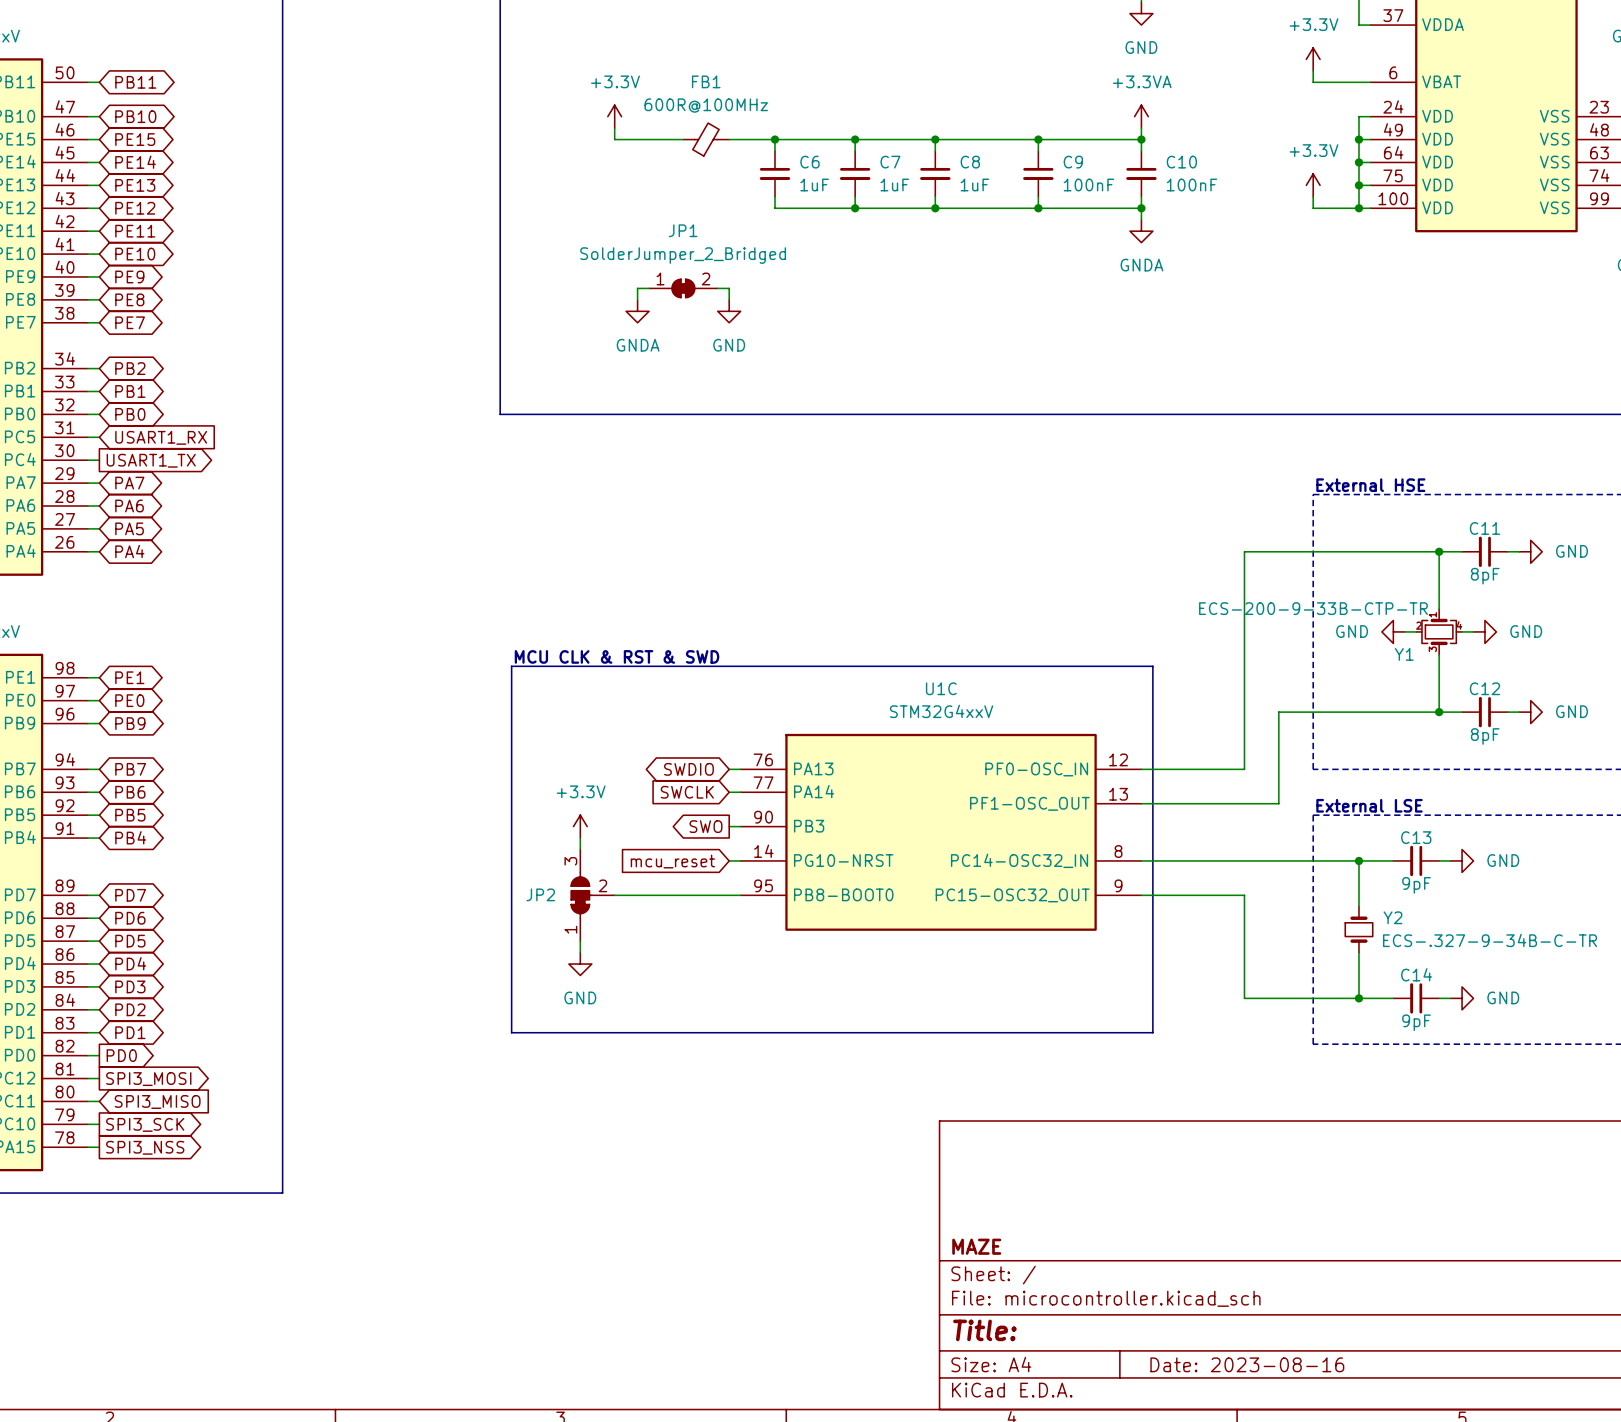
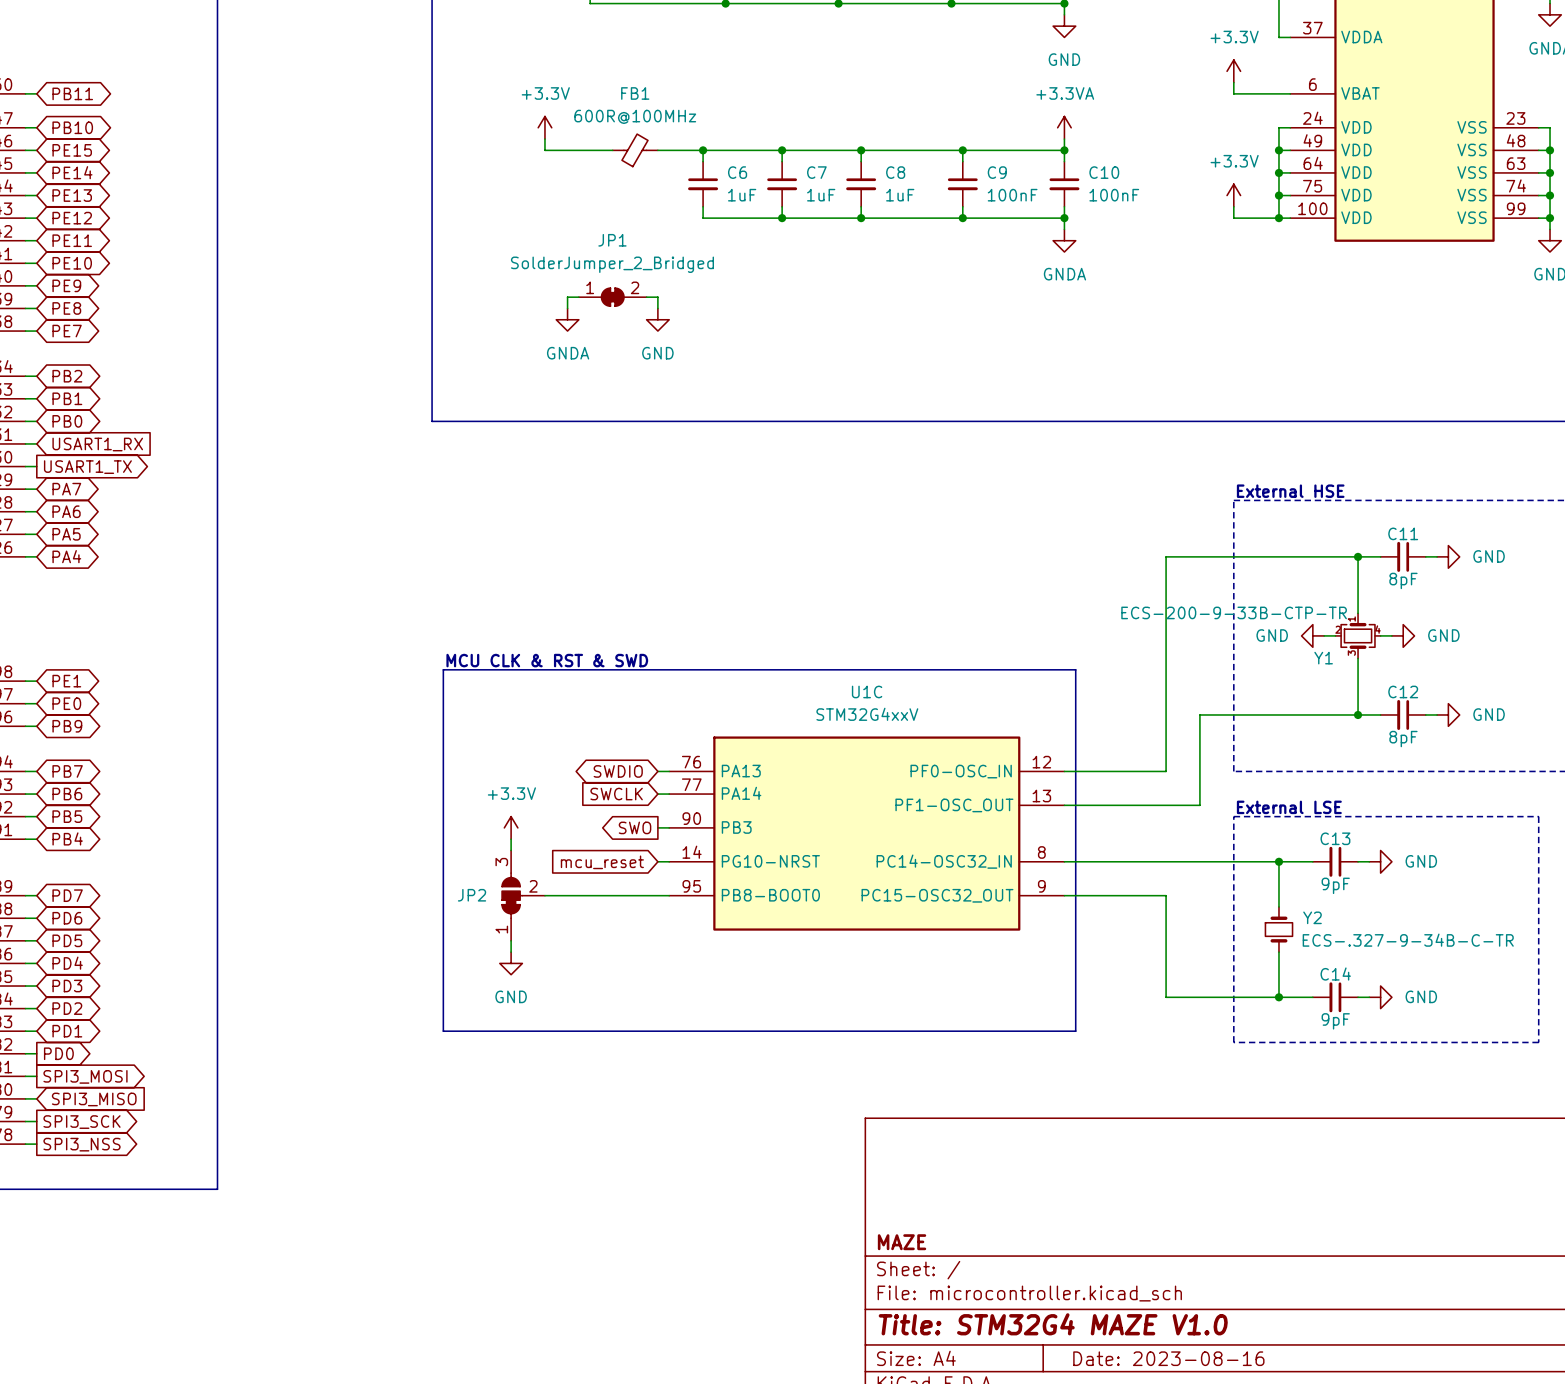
title block: Title: (984, 1330) -> Title: STM32G4 MAZE V1.0 (1053, 1324)

